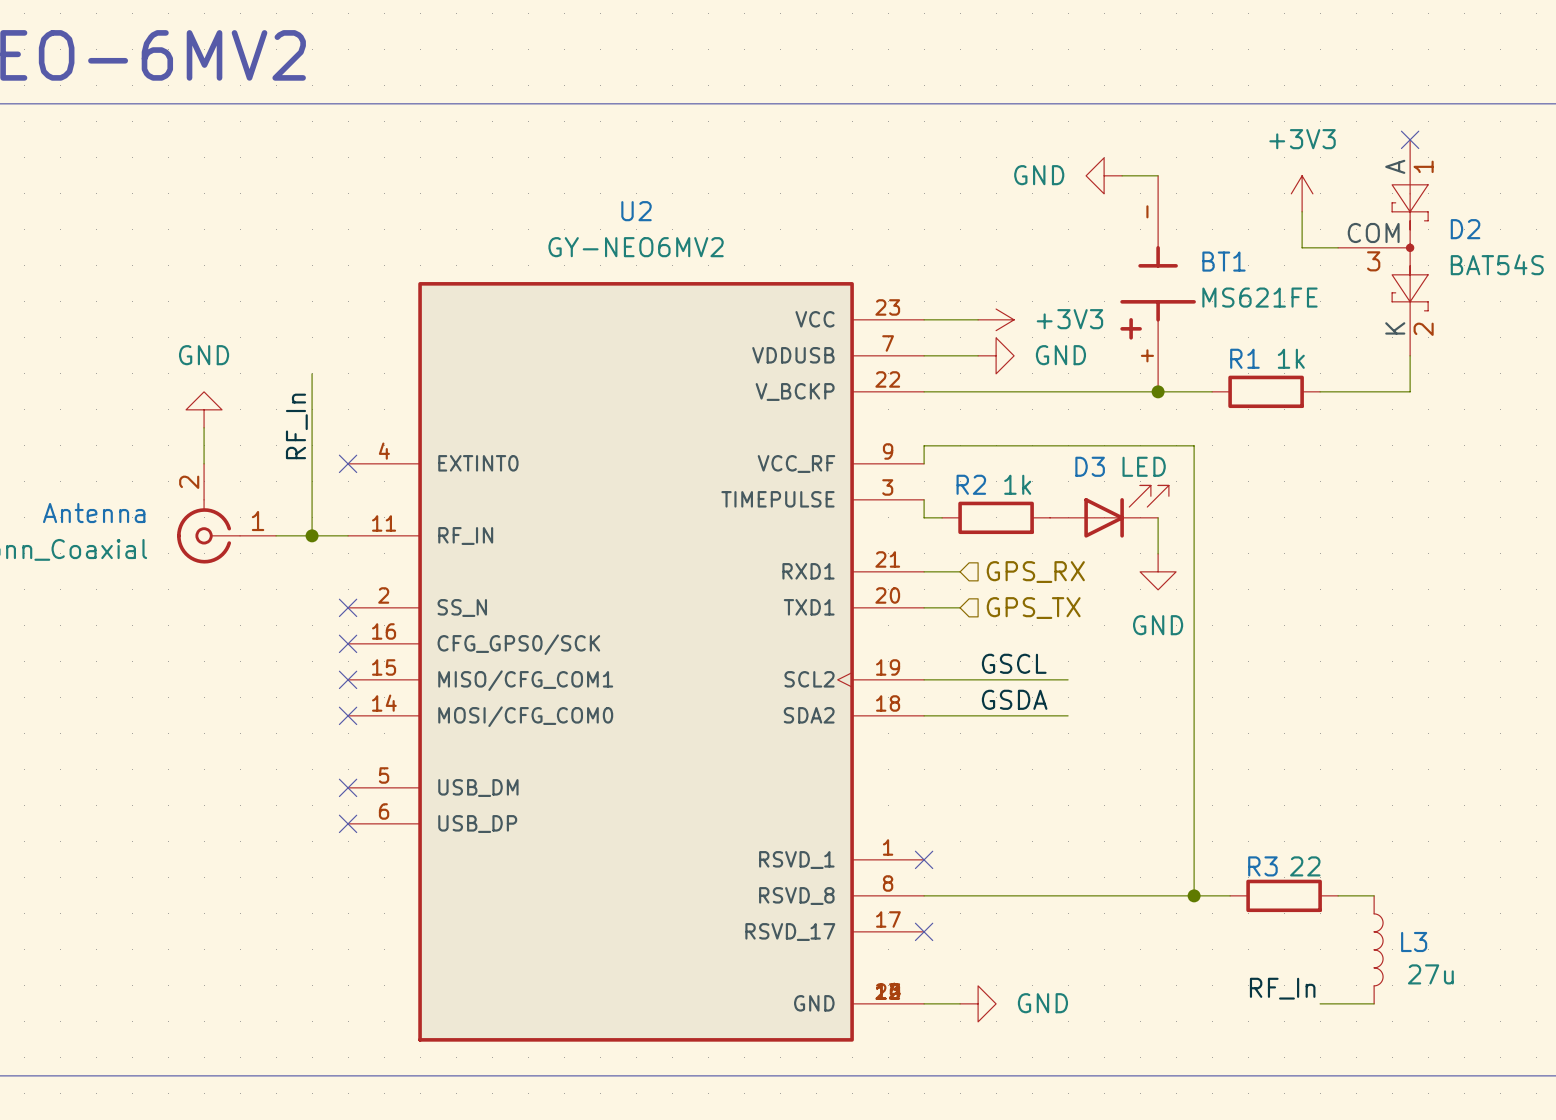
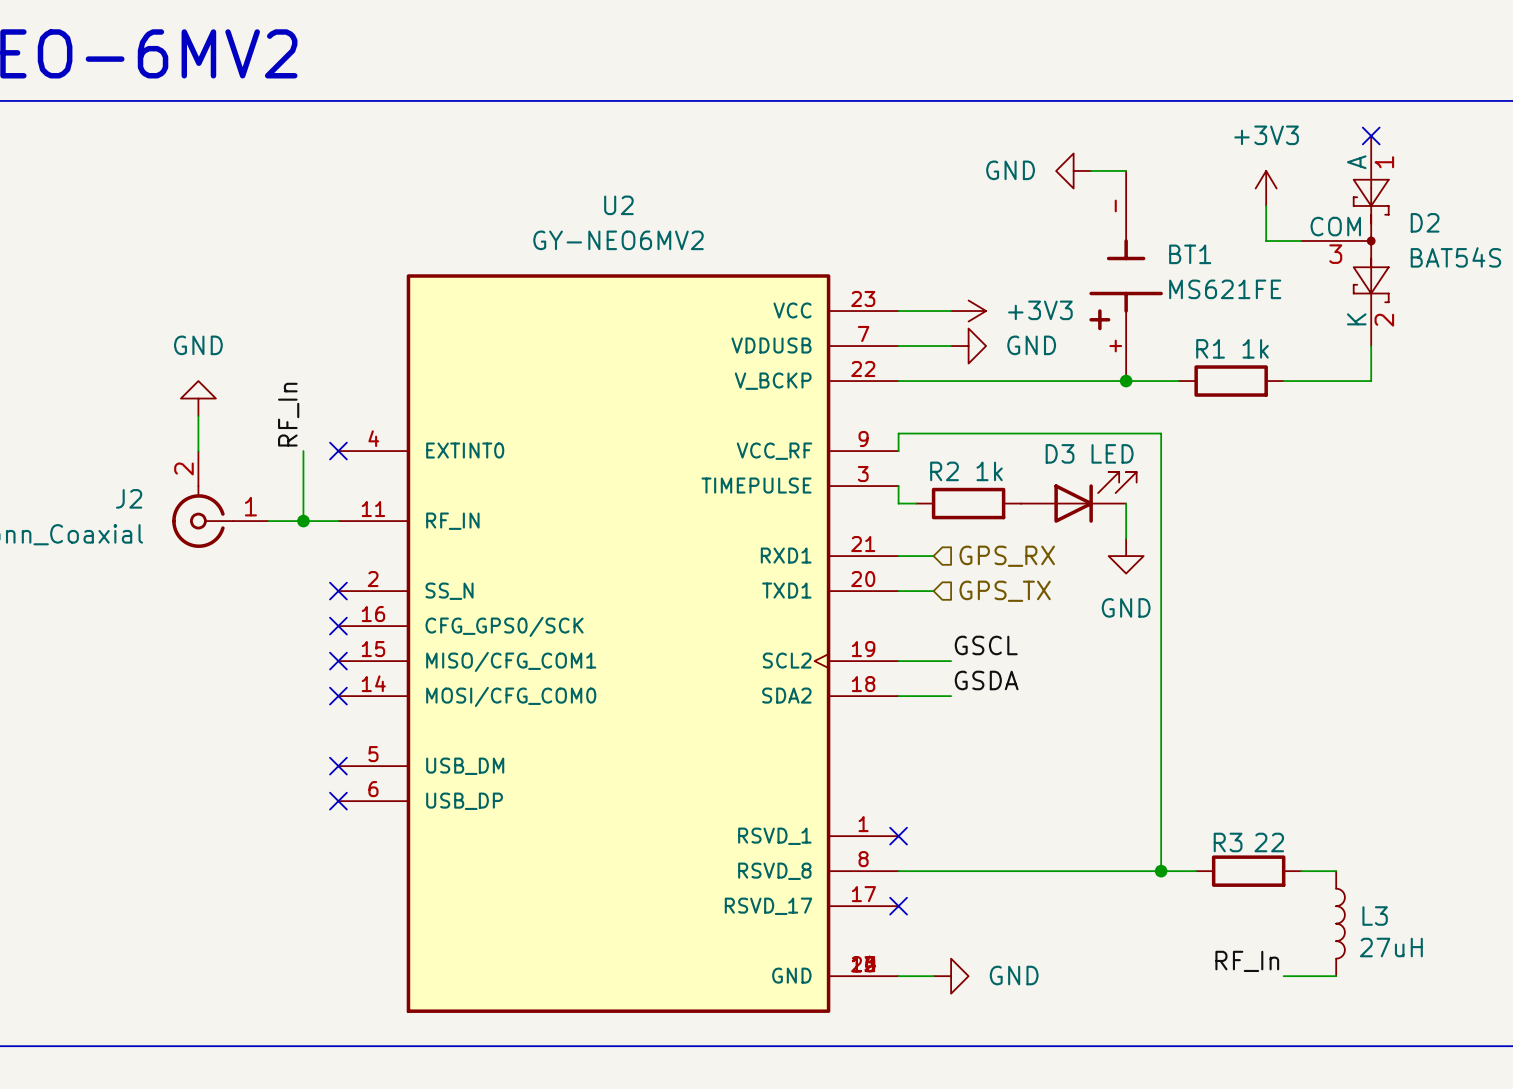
wire: (312, 373) (312, 463) -> none
Antenna name: Antenna (94, 513) -> J2 (129, 498)
wire: (978, 679) (1068, 679) -> none
wire: (978, 715) (1068, 715) -> none
L3 value: 27u (1430, 974) -> 27uH (1391, 947)

